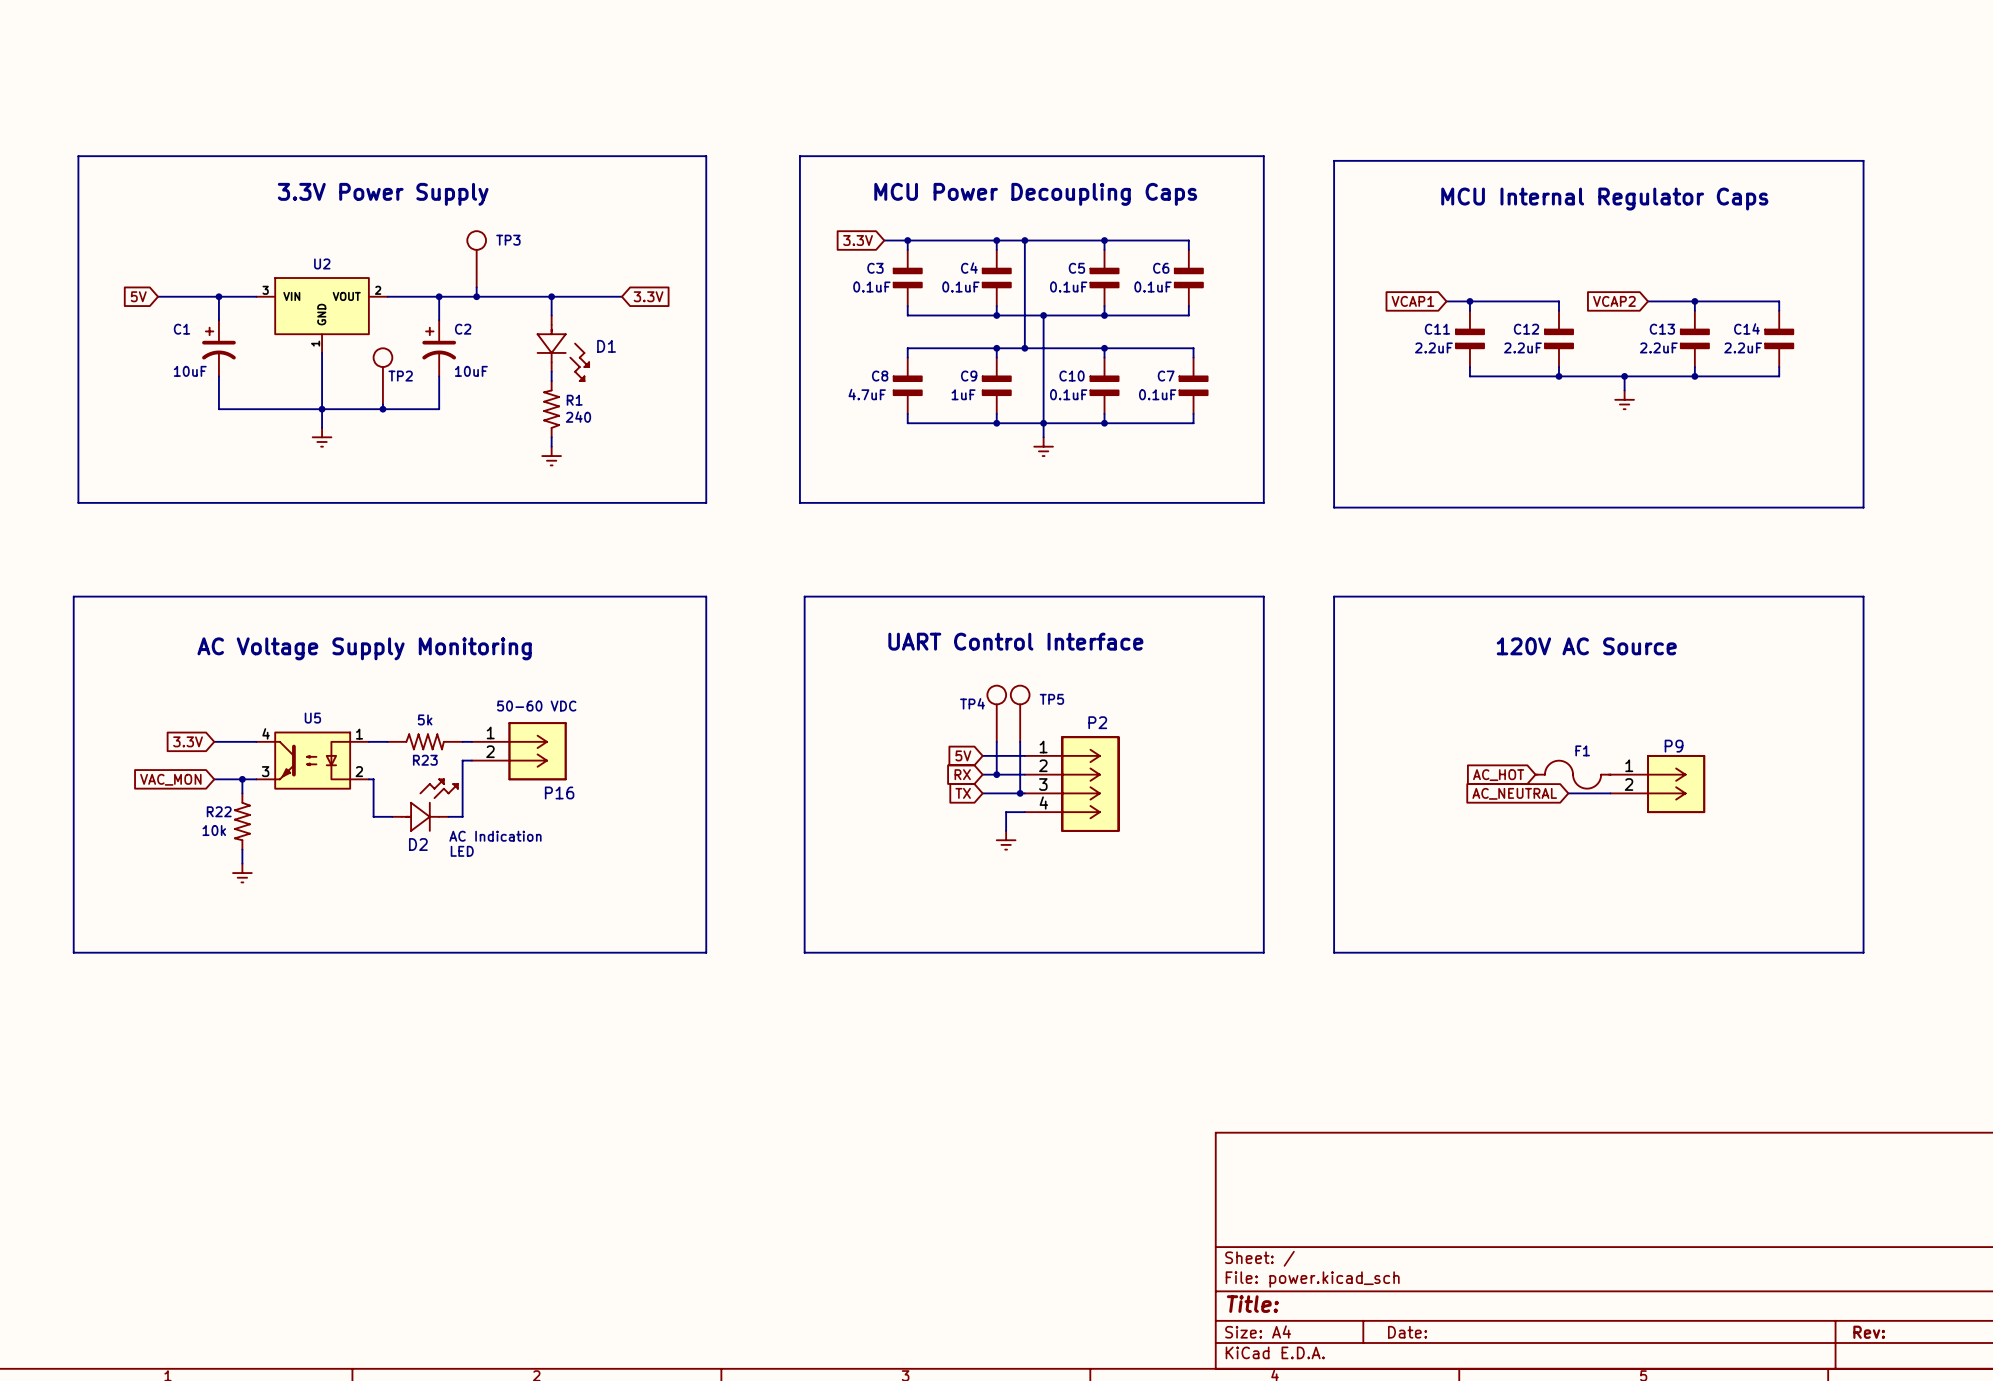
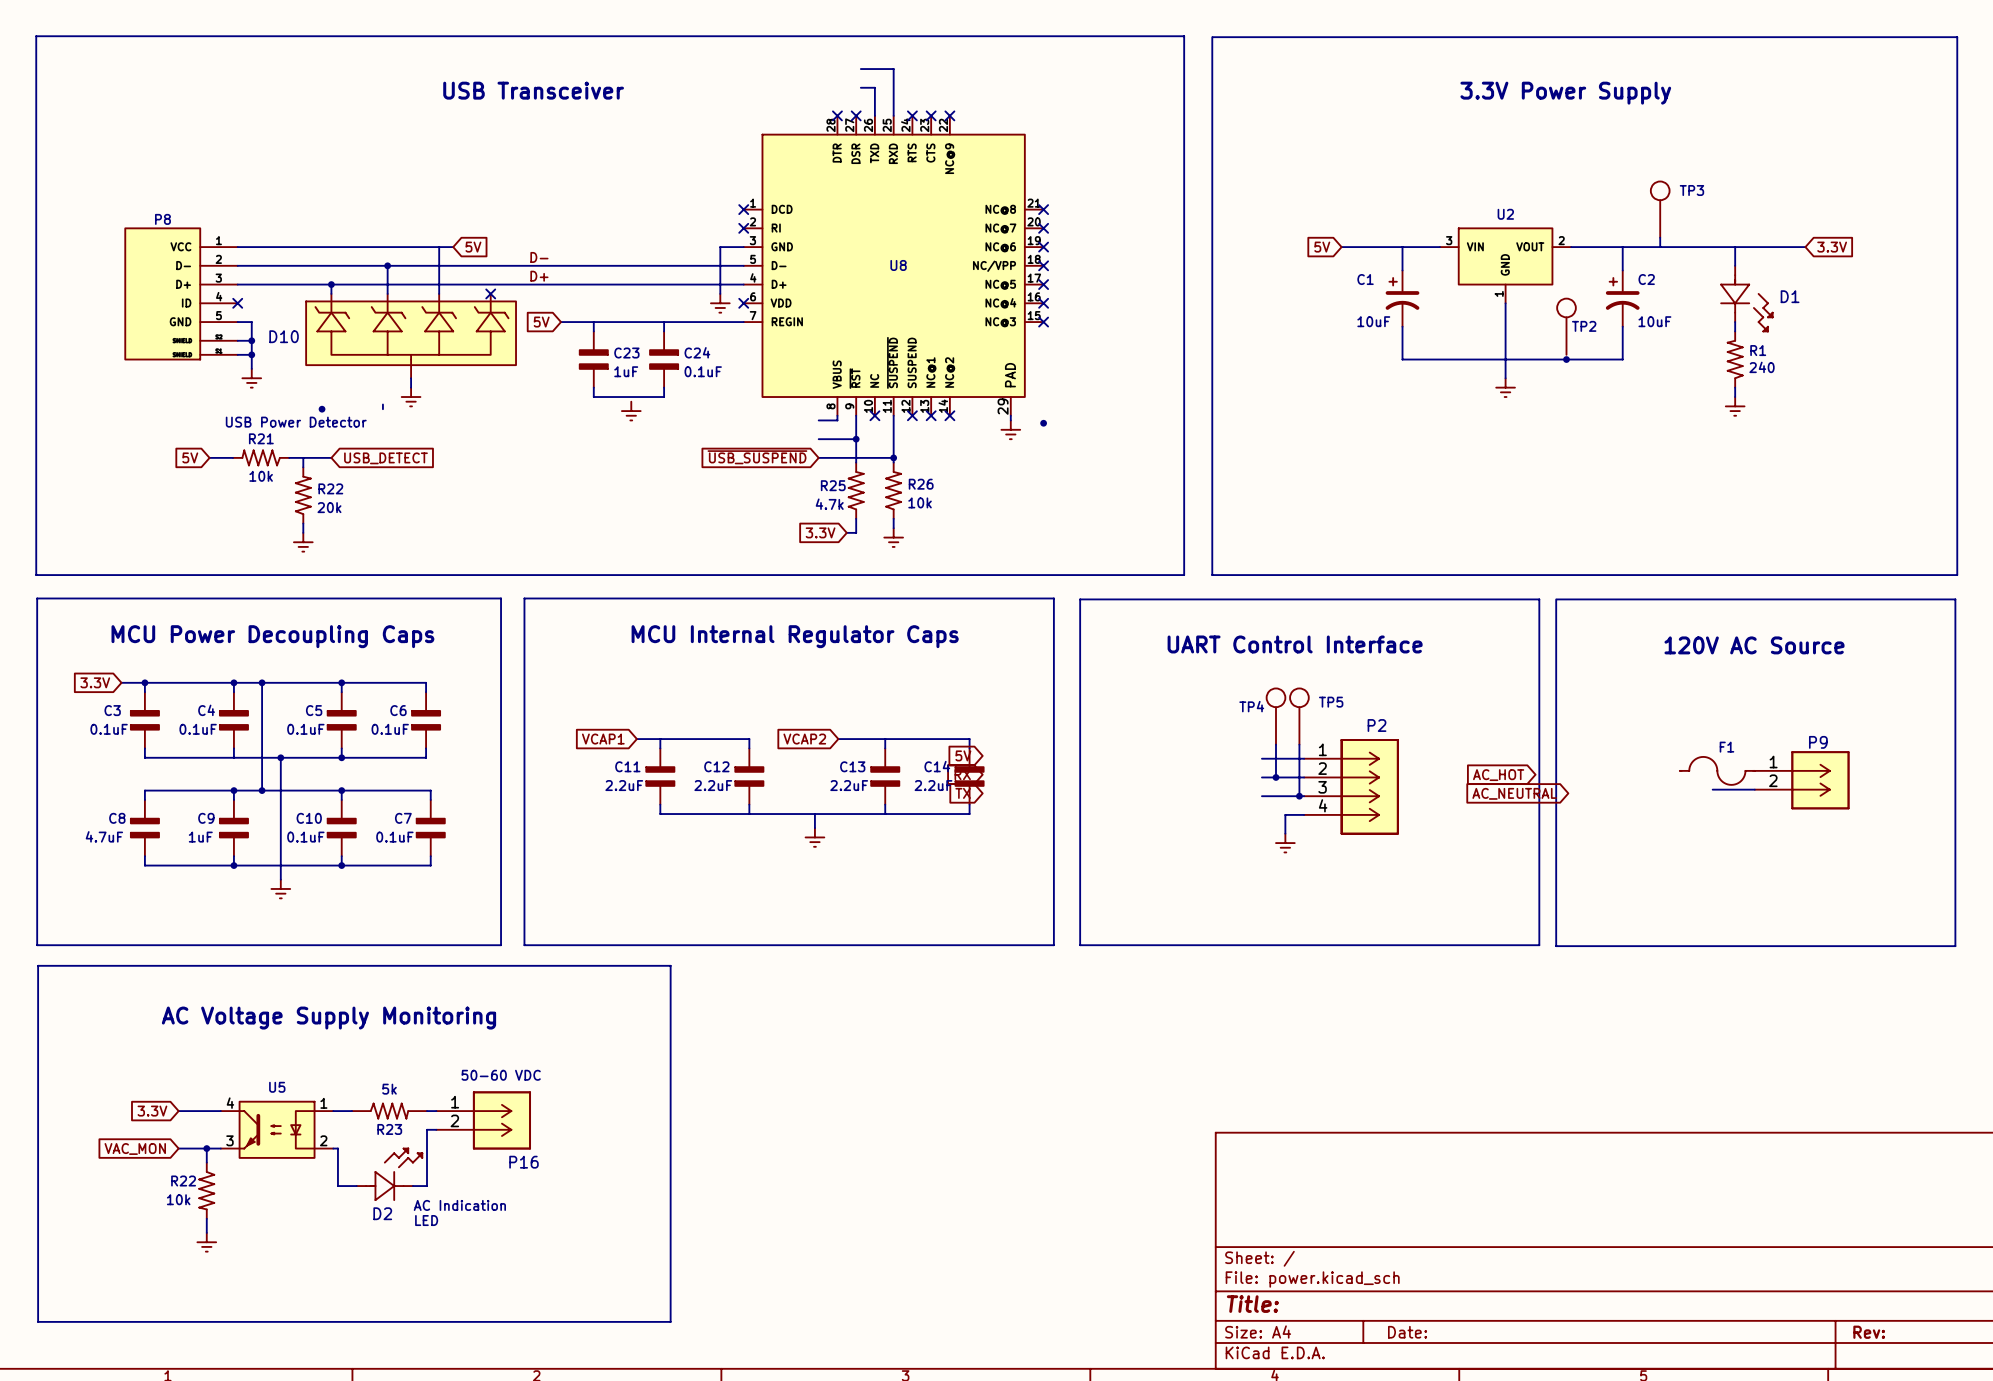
line: none -> (36, 36) (1184, 36) (1184, 575) (36, 575) (36, 36)
line: none -> (1212, 37) (1212, 575) (1957, 575) (1957, 37) (1213, 37)
wire: none -> (860, 69) (893, 69) (893, 115)
wire: none -> (860, 87) (874, 87) (874, 115)
text: none -> USB Transceiver (533, 90)
text: none -> 3.3V Power Supply (1565, 93)
no-connect mark: none -> (837, 115)
no-connect mark: none -> (856, 115)
no-connect mark: none -> (912, 115)
no-connect mark: none -> (931, 115)
no-connect mark: none -> (949, 115)
line: (78, 156) (706, 156) (706, 502) (78, 502) (78, 156) -> none
line: (799, 156) (799, 502) (1263, 502) (1263, 156) (799, 156) -> none
line: (1334, 160) (1334, 507) (1863, 507) (1863, 160) (1334, 160) -> none
text: 3.3V Power Supply (383, 194) -> none
text: MCU Power Decoupling Caps (1035, 194) -> none
text: MCU Internal Regulator Caps (1604, 199) -> none
no-connect mark: none -> (743, 209)
no-connect mark: none -> (1043, 209)
no-connect mark: none -> (743, 228)
no-connect mark: none -> (1043, 228)
global label: 3.3V (858, 240) -> none
wire: (884, 240) (1188, 240) (1188, 249) -> none
junction: (907, 240) -> none
junction: (996, 240) -> none
junction: (1024, 240) -> none
wire: (1104, 240) (1104, 249) -> none
junction: (1104, 240) -> none
wire: none -> (237, 247) (453, 247)
wire: none -> (439, 247) (439, 293)
global label: none -> 5V (473, 247)
wire: none -> (743, 247) (720, 247) (720, 293)
no-connect mark: none -> (1043, 247)
global label: none -> 5V (1322, 247)
wire: none -> (1341, 247) (1439, 247)
wire: none -> (1402, 247) (1402, 270)
wire: none -> (1571, 247) (1805, 247)
wire: none -> (1622, 247) (1622, 270)
wire: none -> (1735, 247) (1735, 265)
global label: none -> 3.3V (1832, 247)
label: none -> D- (539, 257)
TP3 position: (476, 259) -> (1660, 209)
wire: none -> (237, 265) (743, 265)
wire: none -> (387, 265) (387, 293)
junction: none -> (387, 265)
U8: none -> (893, 265)
no-connect mark: none -> (1043, 265)
label: none -> D+ (539, 276)
C3 position: (907, 278) -> (144, 720)
C4 position: (996, 278) -> (233, 720)
C5 position: (1104, 278) -> (341, 720)
C6 position: (1188, 278) -> (426, 720)
wire: none -> (237, 284) (743, 284)
junction: none -> (331, 284)
no-connect mark: none -> (1043, 284)
wire: (476, 287) (476, 296) -> (411, 378) (411, 387)
P8: none -> (181, 293)
no-connect mark: none -> (490, 293)
global label: 5V (138, 296) -> none
wire: (158, 296) (256, 296) -> none
wire: (218, 296) (218, 320) -> none
junction: (218, 296) -> none
wire: (387, 296) (621, 296) -> none
junction: (439, 296) -> none
junction: (476, 296) -> none
wire: (551, 296) (551, 315) -> none
junction: (551, 296) -> none
global label: 3.3V (648, 296) -> none
global label: VCAP1 (1412, 301) -> none
wire: (1446, 301) (1559, 301) (1559, 310) -> none
wire: (1469, 301) (1469, 310) -> none
junction: (1469, 301) -> none
global label: VCAP2 (1614, 301) -> none
wire: (1648, 301) (1779, 301) (1779, 310) -> none
wire: (1694, 301) (1694, 310) -> (1735, 322) (1735, 331)
junction: (1694, 301) -> none
no-connect mark: none -> (237, 303)
power symbol: none -> (720, 303)
no-connect mark: none -> (743, 303)
no-connect mark: none -> (1043, 303)
wire: none -> (1505, 303) (1505, 378)
wire: (907, 306) (907, 315) (1188, 315) (1188, 306) -> none
wire: (1104, 306) (1104, 315) -> none
U2 position: (322, 315) -> (1505, 265)
junction: (996, 315) -> none
wire: (1043, 315) (1043, 437) -> none
junction: (1043, 315) -> none
junction: (1104, 315) -> none
wire: none -> (237, 322) (251, 322) (251, 368)
global label: none -> 5V (541, 322)
wire: none -> (561, 322) (743, 322)
no-connect mark: none -> (1043, 322)
wire: none -> (1402, 326) (1402, 359) (1622, 359) (1622, 326)
D10: none -> (411, 336)
C11 position: (1469, 338) -> (660, 776)
C12 position: (1559, 338) -> (749, 776)
C13 position: (1694, 338) -> (885, 776)
C14 position: (1779, 338) -> (969, 776)
wire: none -> (237, 340) (251, 340)
junction: none -> (251, 340)
C1 position: (218, 348) -> (1402, 298)
C2 position: (439, 348) -> (1622, 298)
D1 position: (563, 348) -> (1746, 298)
junction: (996, 348) -> none
junction: (1024, 348) -> none
wire: (1104, 348) (1104, 357) -> none
junction: (1104, 348) -> none
wire: (322, 352) (322, 427) -> none
wire: none -> (237, 354) (251, 354)
junction: none -> (251, 354)
wire: (907, 357) (907, 348) (1193, 348) (1193, 357) -> none
C23: none -> 1uF (593, 359)
C24: none -> 0.1uF (664, 359)
wire: (1469, 367) (1469, 376) (1779, 376) (1779, 367) -> none
wire: (1559, 367) (1559, 376) -> (1660, 237) (1660, 247)
wire: (1694, 367) (1694, 376) -> (1735, 387) (1735, 397)
wire: (551, 371) (551, 381) -> (593, 322) (593, 331)
wire: (218, 376) (218, 409) (439, 409) (439, 376) -> none
TP2 position: (382, 376) -> (1566, 326)
junction position: (1559, 376) -> (1566, 359)
wire: (1624, 376) (1624, 390) -> none
junction: (1624, 376) -> none
junction: (1694, 376) -> none
power symbol: none -> (251, 378)
C8 position: (907, 385) -> (144, 828)
C9 position: (996, 385) -> (233, 828)
C10 position: (1104, 385) -> (341, 828)
C7 position: (1193, 385) -> (430, 828)
wire: none -> (593, 387) (593, 397) (664, 397) (664, 387)
power symbol: none -> (1505, 387)
power symbol: none -> (411, 397)
power symbol: (1624, 399) -> none
power symbol: none -> (1735, 406)
junction: (382, 409) -> none
R1 position: (551, 409) -> (1735, 359)
power symbol: none -> (631, 411)
wire: (907, 413) (907, 423) (1193, 423) (1193, 413) -> none
wire: (996, 413) (996, 423) -> (893, 518) (893, 528)
wire: (1104, 413) (1104, 423) -> none
wire: none -> (837, 415) (837, 420) (818, 420)
wire: none -> (856, 415) (856, 462)
no-connect mark: none -> (874, 415)
wire: none -> (893, 415) (893, 462)
no-connect mark: none -> (912, 415)
no-connect mark: none -> (931, 415)
no-connect mark: none -> (949, 415)
wire: none -> (1010, 415) (1010, 420)
text: none -> USB Power Detector (296, 422)
junction: (996, 423) -> none
junction: (1104, 423) -> none
power symbol: (322, 437) -> none
wire: (551, 437) (551, 446) -> (664, 322) (664, 331)
wire: none -> (818, 439) (856, 439)
junction: none -> (856, 439)
power symbol position: (1043, 446) -> (1010, 429)
power symbol: (551, 456) -> none
global label: none -> 5V (190, 457)
wire: none -> (209, 457) (233, 457)
R21: none -> 10k (261, 457)
wire: none -> (289, 457) (331, 457)
wire: none -> (303, 457) (303, 467)
global label: none -> ~{USB_SUSPEND} (757, 457)
wire: none -> (818, 457) (893, 457)
junction: none -> (893, 457)
global label: none -> USB_DETECT (385, 458)
R25: none -> 4.7k (856, 490)
R26: none -> 10k (893, 490)
R22: none -> 20k (303, 495)
wire: none -> (856, 518) (856, 532) (846, 532)
wire: none -> (303, 523) (303, 532)
global label: none -> 3.3V (820, 532)
power symbol: none -> (893, 537)
power symbol: none -> (303, 542)
line: (73, 596) (73, 952) (706, 952) (706, 596) (73, 596) -> (37, 598) (37, 945) (501, 945) (501, 598) (37, 598)
line: (804, 596) (1263, 596) (1263, 952) (804, 952) (804, 596) -> none
line: (1334, 596) (1334, 952) (1863, 952) (1863, 596) (1334, 596) -> none
line: none -> (524, 598) (524, 945) (1053, 945) (1053, 598) (524, 598)
line: none -> (1080, 599) (1539, 599) (1539, 945) (1080, 945) (1080, 599)
line: none -> (1556, 599) (1556, 946) (1955, 946) (1955, 599) (1557, 599)
text: none -> MCU Power Decoupling Caps (272, 636)
text: none -> MCU Internal Regulator Caps (795, 636)
text: UART Control Interface (1015, 641) -> none
text: none -> UART Control Interface (1295, 644)
text position: 120V AC Source (1586, 646) -> 120V AC Source (1754, 645)
text: AC Voltage Supply Monitoring (364, 648) -> none
wire: none -> (121, 682) (426, 682) (426, 692)
wire: none -> (144, 682) (144, 692)
junction: none -> (144, 682)
wire: none -> (233, 682) (233, 692)
junction: none -> (233, 682)
wire: none -> (262, 682) (262, 790)
junction: none -> (262, 682)
wire: none -> (341, 682) (341, 692)
junction: none -> (341, 682)
text: 50-60 VDC (536, 706) -> none
TP4 position: (996, 713) -> (1276, 716)
TP5 position: (1020, 713) -> (1299, 716)
global label: none -> VCAP1 (603, 739)
wire: none -> (636, 739) (749, 739) (749, 748)
wire: none -> (660, 739) (660, 748)
global label: none -> VCAP2 (804, 739)
wire: none -> (838, 739) (969, 739) (969, 748)
wire: none -> (885, 739) (885, 748)
global label position: 3.3V (188, 741) -> 3.3V (95, 682)
wire: (214, 741) (256, 741) -> none
wire: (368, 741) (387, 741) -> none
R23 position: (425, 741) -> (389, 1111)
wire: (462, 741) (471, 741) -> none
wire: (996, 741) (996, 774) -> none
wire: (1020, 741) (1020, 793) -> none
wire: none -> (1276, 744) (1276, 777)
wire: none -> (1299, 744) (1299, 796)
wire: none -> (144, 748) (144, 757) (426, 757) (426, 748)
wire: none -> (233, 748) (233, 757)
P16 position: (519, 751) -> (483, 1120)
wire: (982, 755) (1024, 755) -> none
wire: none -> (280, 757) (280, 879)
junction: none -> (280, 757)
junction: none -> (341, 757)
wire: none -> (1261, 758) (1304, 758)
U5 position: (312, 760) -> (277, 1129)
wire: (471, 760) (462, 760) (462, 816) (448, 816) -> none
wire: (982, 774) (1024, 774) -> none
junction: (996, 774) -> none
F1 position: (1573, 774) -> (1717, 770)
wire: none -> (1261, 777) (1304, 777)
junction: none -> (1276, 777)
global label: VAC_MON (170, 779) -> none
wire: (214, 779) (256, 779) -> none
wire: (242, 779) (242, 793) -> none
junction: (242, 779) -> none
wire: (368, 779) (373, 779) (373, 816) (392, 816) -> none
P2 position: (1071, 784) -> (1351, 786)
P9 position: (1657, 784) -> (1802, 780)
wire: none -> (233, 790) (233, 799)
junction: none -> (233, 790)
junction: none -> (262, 790)
wire: none -> (341, 790) (341, 799)
junction: none -> (341, 790)
wire: (982, 793) (1024, 793) -> none
junction: (1020, 793) -> none
wire: (1568, 793) (1610, 793) -> (1712, 789) (1754, 789)
wire: none -> (1261, 796) (1304, 796)
junction: none -> (1299, 796)
wire: none -> (144, 799) (144, 790) (430, 790) (430, 799)
wire: none -> (660, 804) (660, 814) (969, 814) (969, 804)
wire: none -> (749, 804) (749, 814)
wire: none -> (885, 804) (885, 814)
D2 position: (425, 805) -> (389, 1174)
wire: (1024, 812) (1006, 812) (1006, 830) -> none
wire: none -> (814, 814) (814, 828)
wire: none -> (1304, 814) (1285, 814) (1285, 833)
R22: 10k (242, 821) -> none
text: AC Indication (495, 836) -> none
power symbol: none -> (814, 837)
power symbol: (1006, 840) -> none
power symbol: none -> (1285, 843)
wire: (242, 849) (242, 863) -> none
text: LED (462, 851) -> none
wire: none -> (144, 856) (144, 865) (430, 865) (430, 856)
wire: none -> (233, 856) (233, 865)
wire: none -> (341, 856) (341, 865)
junction: none -> (233, 865)
junction: none -> (341, 865)
power symbol position: (242, 873) -> (280, 888)
line: none -> (38, 965) (38, 1321) (670, 1321) (670, 965) (38, 965)
text: none -> AC Voltage Supply Monitoring (328, 1018)
text: none -> 50-60 VDC (501, 1075)
global label: none -> 3.3V (152, 1111)
wire: none -> (178, 1111) (220, 1111)
wire: none -> (333, 1111) (352, 1111)
wire: none -> (427, 1111) (436, 1111)
wire: none -> (436, 1129) (427, 1129) (427, 1186) (412, 1186)
wire: none -> (178, 1148) (220, 1148)
wire: none -> (206, 1148) (206, 1162)
junction: none -> (206, 1148)
wire: none -> (333, 1148) (337, 1148) (337, 1186) (356, 1186)
global label: none -> VAC_MON (135, 1149)
R22: none -> 10k (206, 1190)
text: none -> AC Indication (459, 1205)
wire: none -> (206, 1218) (206, 1232)
text: none -> LED (426, 1220)
power symbol: none -> (206, 1242)

